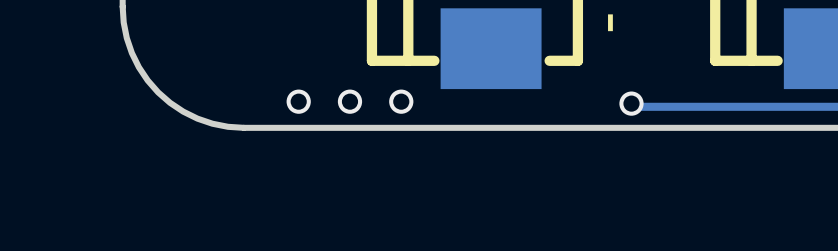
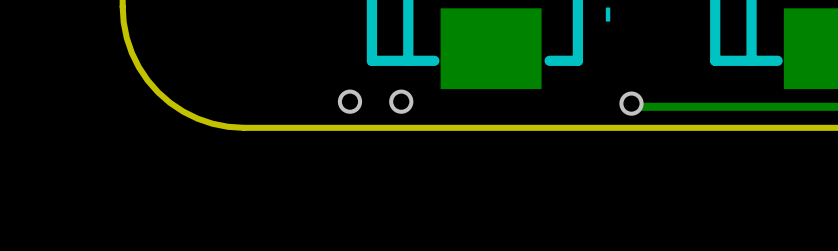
via: (298, 101) -> none

